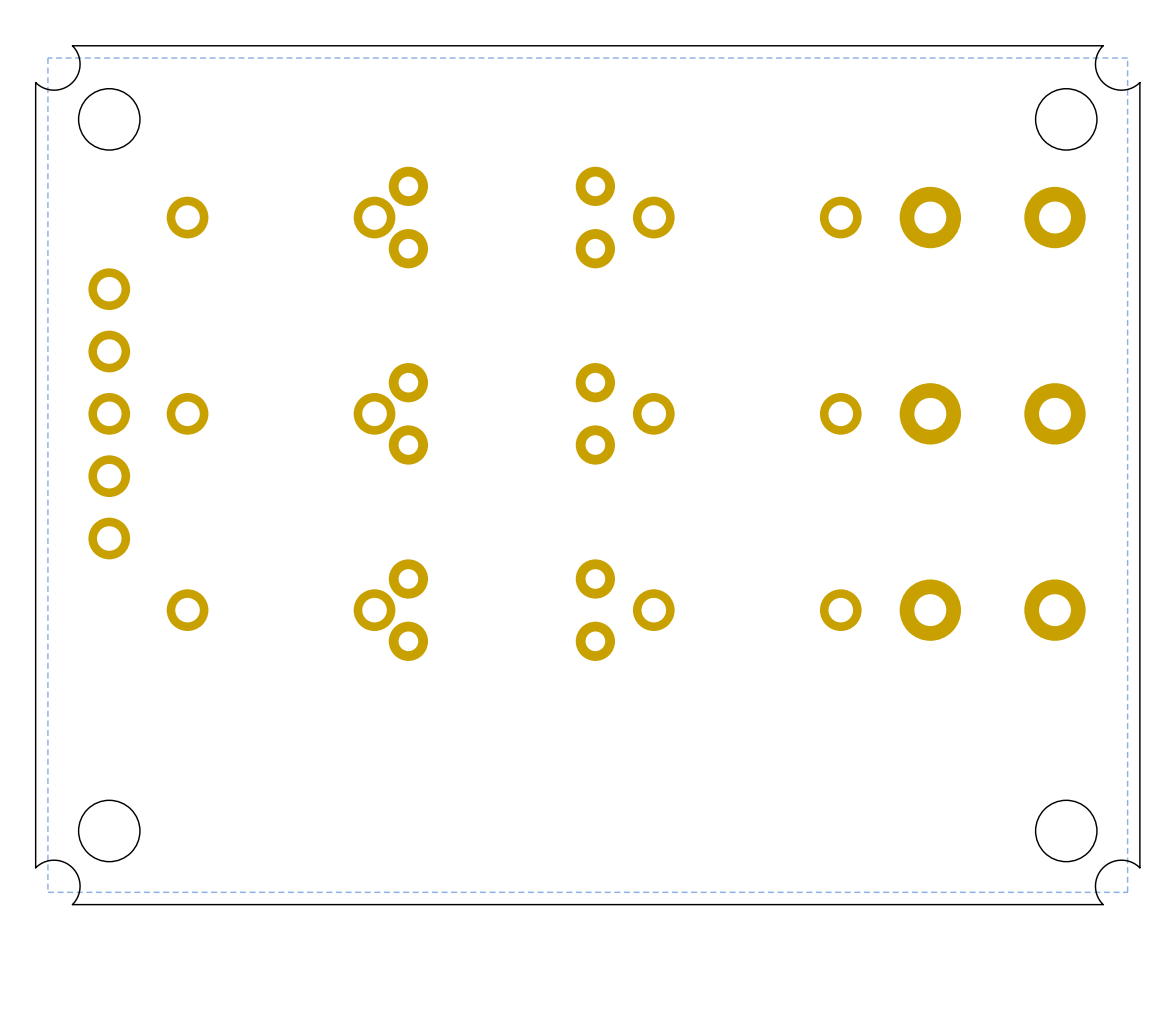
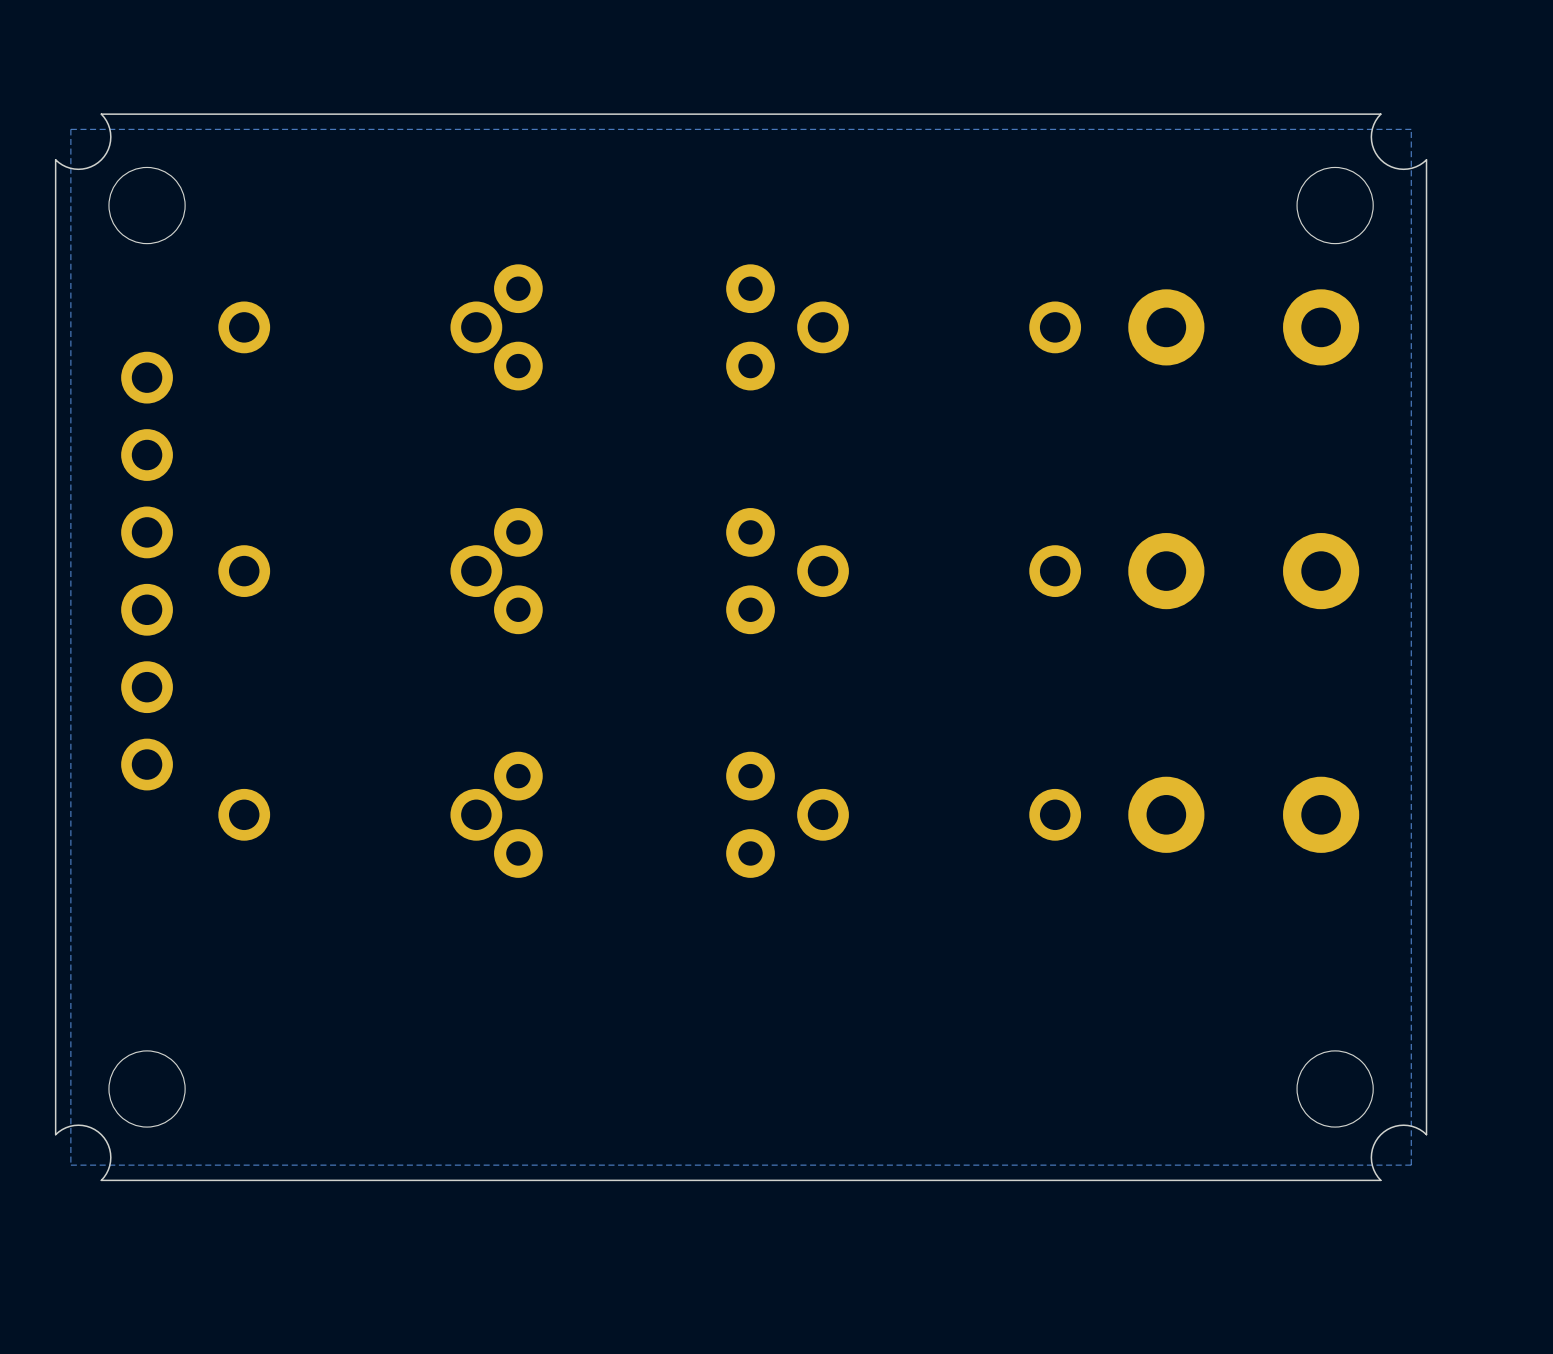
part footprint: [88, 268, 131, 560] -> [121, 351, 173, 791]

